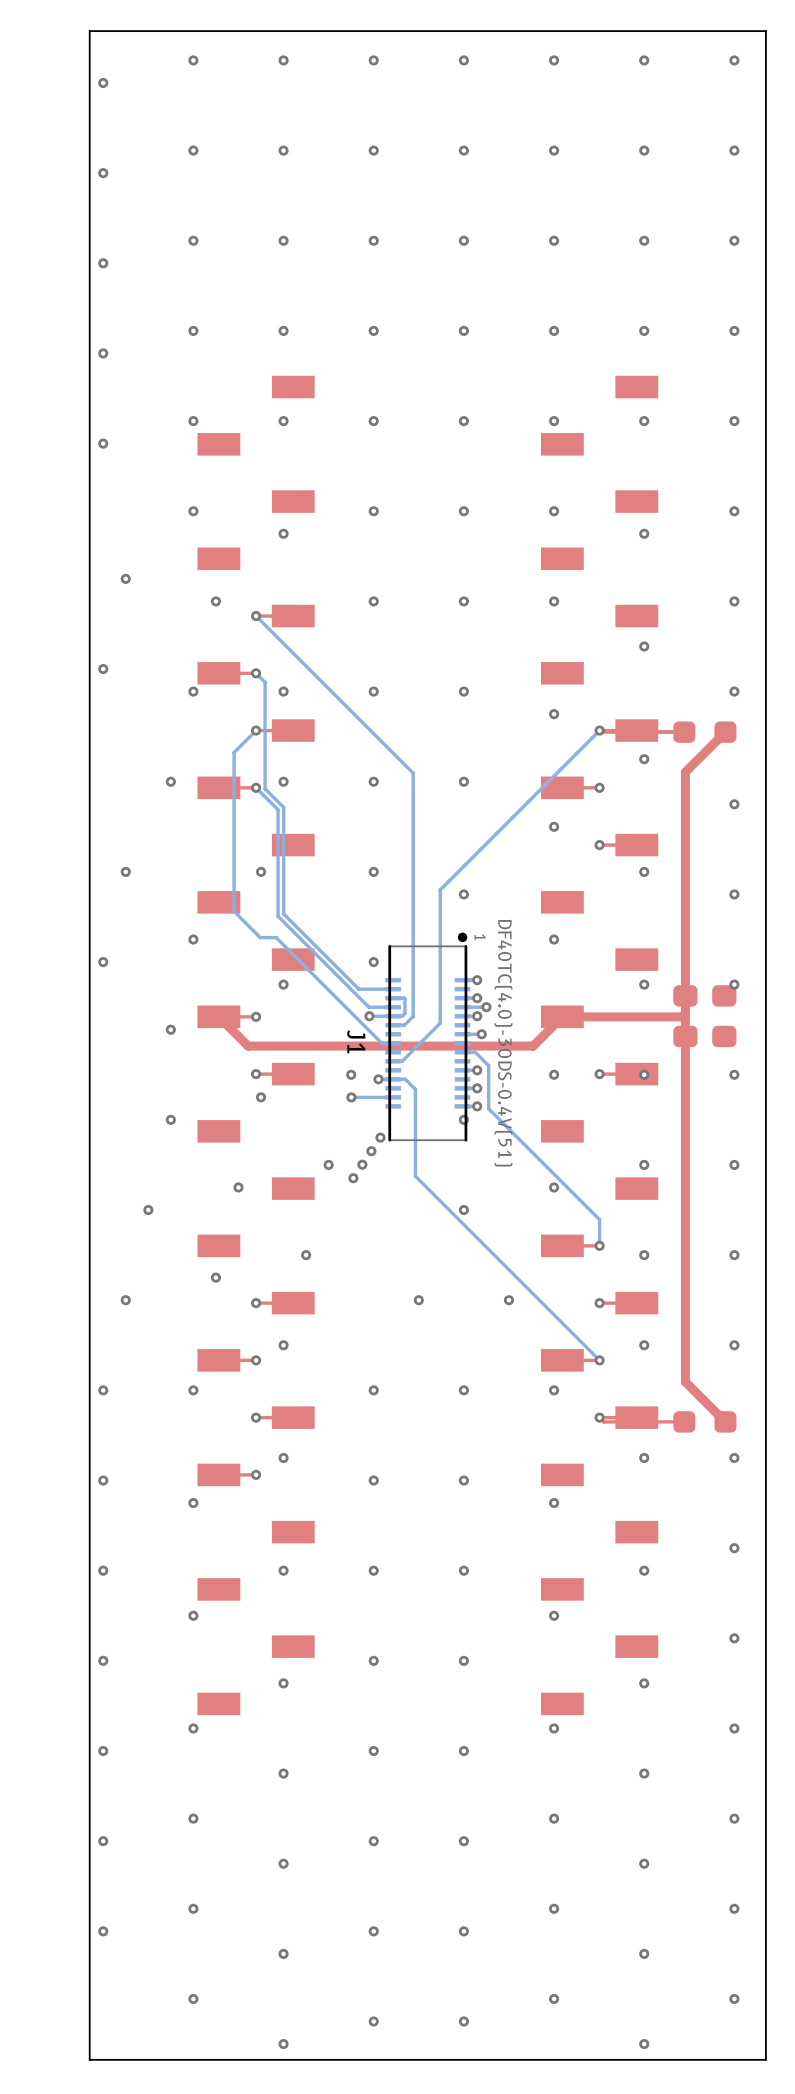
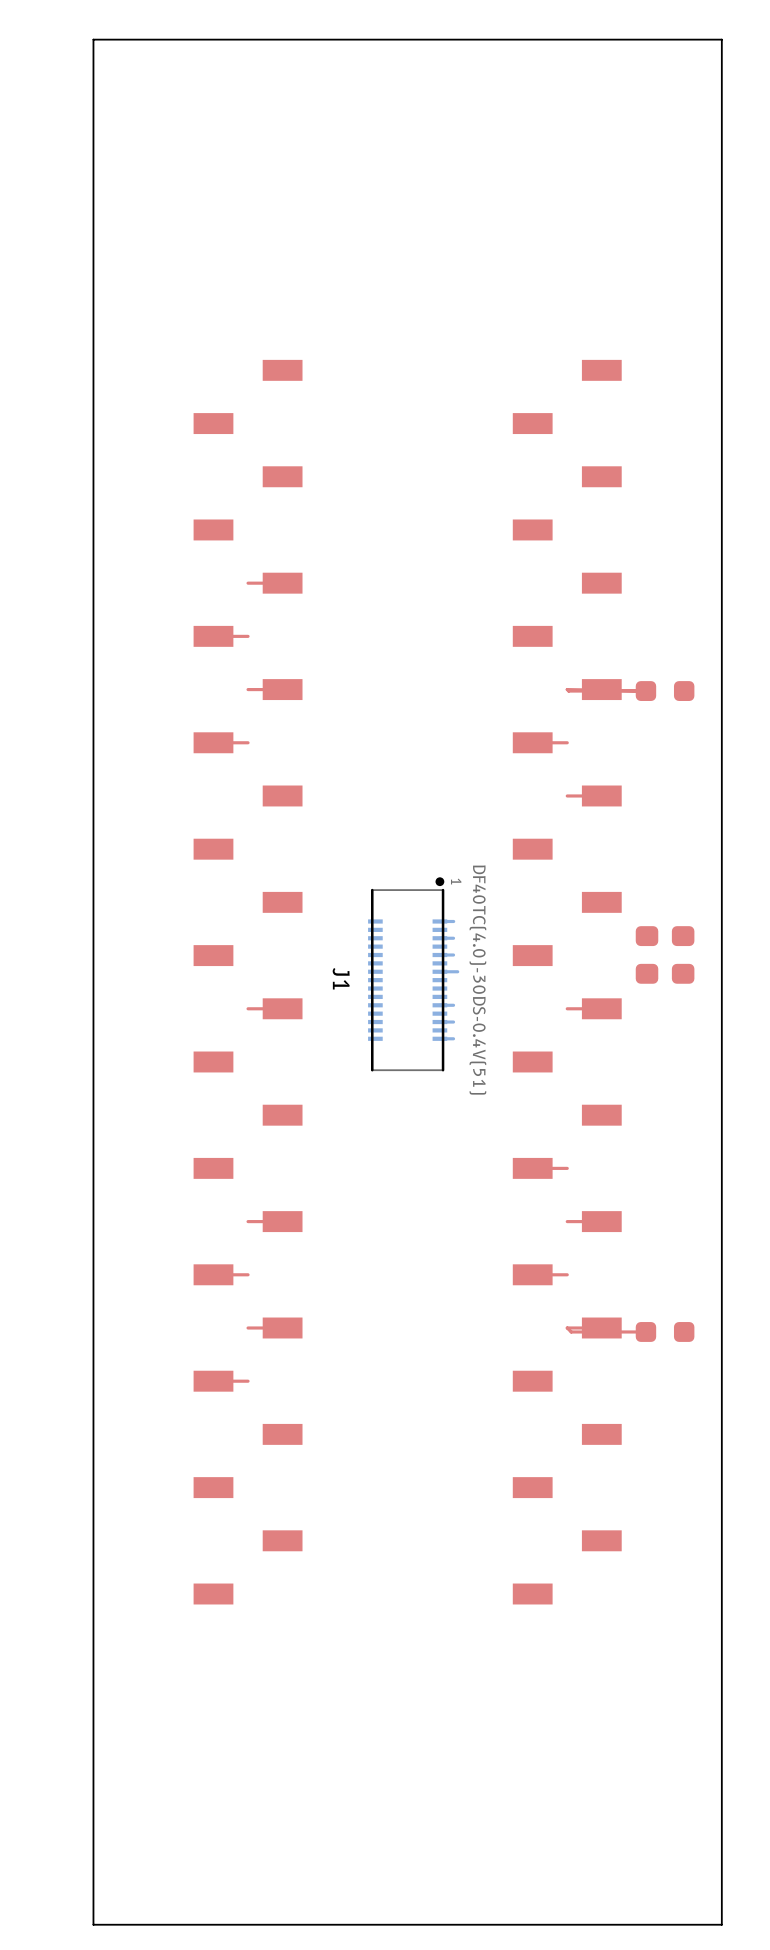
via: (193, 60) -> none
via: (283, 60) -> none
via: (373, 60) -> none
via: (463, 60) -> none
via: (554, 60) -> none
via: (644, 60) -> none
via: (734, 60) -> none
via: (103, 82) -> none
via: (193, 150) -> none
via: (283, 150) -> none
via: (373, 150) -> none
via: (463, 150) -> none
via: (554, 150) -> none
via: (644, 150) -> none
via: (734, 150) -> none
via: (103, 173) -> none
via: (193, 240) -> none
via: (283, 240) -> none
via: (373, 240) -> none
via: (463, 240) -> none
via: (554, 240) -> none
via: (644, 240) -> none
via: (734, 240) -> none
via: (103, 263) -> none
via: (193, 330) -> none
via: (283, 330) -> none
via: (373, 330) -> none
via: (463, 330) -> none
via: (554, 330) -> none
via: (644, 330) -> none
via: (734, 330) -> none
via: (103, 353) -> none
via: (193, 421) -> none
via: (283, 421) -> none
via: (373, 421) -> none
via: (463, 421) -> none
via: (554, 421) -> none
via: (644, 421) -> none
via: (734, 421) -> none
via: (103, 443) -> none
via: (193, 511) -> none
via: (373, 511) -> none
via: (463, 511) -> none
via: (554, 511) -> none
via: (734, 511) -> none
via: (283, 533) -> none
via: (644, 533) -> none
via: (125, 578) -> none
via: (215, 601) -> none
via: (373, 601) -> none
via: (463, 601) -> none
via: (554, 601) -> none
via: (734, 601) -> none
bottom track: (256, 616) (413, 773) (413, 1016) (404, 1025) (393, 1025) -> none
via: (256, 616) -> none
via: (644, 646) -> none
via: (103, 669) -> none
bottom track: (256, 673) (265, 682) (265, 788) (283, 807) (283, 913) (358, 989) (393, 989) -> none
via: (256, 673) -> none
via: (193, 691) -> none
via: (283, 691) -> none
via: (373, 691) -> none
via: (463, 691) -> none
via: (734, 691) -> none
via: (554, 714) -> none
bottom track: (256, 730) (234, 752) (234, 911) (260, 937) (276, 937) (381, 1043) (393, 1043) -> none
via: (256, 730) -> none
bottom track: (599, 730) (440, 889) (440, 1023) (402, 1061) (393, 1061) -> none
via: (599, 730) -> none
top track: (725, 732) (685, 772) (685, 1381) (725, 1421) -> none
via: (644, 759) -> none
via: (170, 781) -> none
via: (283, 781) -> none
via: (373, 781) -> none
via: (463, 781) -> none
bottom track: (256, 787) (278, 809) (278, 916) (368, 1007) (393, 1007) -> none
via: (256, 787) -> none
via: (599, 787) -> none
via: (734, 804) -> none
via: (554, 826) -> none
via: (599, 845) -> none
via: (125, 871) -> none
via: (261, 871) -> none
via: (373, 871) -> none
via: (644, 871) -> none
via: (463, 894) -> none
via: (734, 894) -> none
via: (193, 939) -> none
via: (554, 939) -> none
via: (103, 962) -> none
via: (373, 962) -> none
via: (477, 980) -> none
via: (283, 984) -> none
via: (644, 984) -> none
via: (734, 984) -> none
bottom track: (393, 998) (404, 998) (404, 1013) (402, 1016) (369, 1016) -> none
via: (477, 998) -> none
bottom track: (486, 1007) (462, 1007) -> none
via: (486, 1007) -> none
top track: (685, 1013) (682, 1016) (562, 1016) (533, 1046) (248, 1046) (218, 1016) (256, 1016) -> none
via: (256, 1016) -> none
via: (369, 1016) -> none
via: (477, 1016) -> none
via: (170, 1029) -> none
via: (481, 1034) -> none
bottom track: (462, 1052) (475, 1052) (488, 1065) (488, 1108) (599, 1219) (599, 1245) -> none
via: (477, 1070) -> none
via: (256, 1074) -> none
via: (351, 1074) -> none
via: (554, 1074) -> none
via: (599, 1074) -> none
via: (644, 1074) -> none
via: (734, 1074) -> none
bottom track: (378, 1079) (405, 1079) (415, 1089) (415, 1176) (599, 1360) -> none
via: (378, 1079) -> none
via: (477, 1088) -> none
via: (261, 1097) -> none
via: (351, 1097) -> none
bottom track: (393, 1097) (351, 1097) -> none
via: (477, 1106) -> none
via: (170, 1119) -> none
via: (463, 1119) -> none
via: (380, 1137) -> none
via: (371, 1151) -> none
via: (328, 1164) -> none
via: (362, 1164) -> none
via: (644, 1164) -> none
via: (734, 1164) -> none
via: (353, 1178) -> none
via: (238, 1187) -> none
via: (554, 1187) -> none
via: (148, 1210) -> none
via: (463, 1210) -> none
via: (599, 1245) -> none
via: (306, 1255) -> none
via: (644, 1255) -> none
via: (734, 1255) -> none
via: (215, 1277) -> none
via: (125, 1300) -> none
via: (418, 1300) -> none
via: (508, 1300) -> none
via: (256, 1303) -> none
via: (599, 1303) -> none
via: (283, 1345) -> none
via: (644, 1345) -> none
via: (734, 1345) -> none
via: (256, 1360) -> none
via: (599, 1360) -> none
via: (103, 1390) -> none
via: (193, 1390) -> none
via: (373, 1390) -> none
via: (463, 1390) -> none
via: (554, 1390) -> none
via: (256, 1417) -> none
via: (599, 1417) -> none
via: (283, 1457) -> none
via: (644, 1457) -> none
via: (734, 1457) -> none
via: (256, 1474) -> none
via: (103, 1480) -> none
via: (373, 1480) -> none
via: (463, 1480) -> none
via: (193, 1503) -> none
via: (554, 1503) -> none
via: (734, 1548) -> none
via: (103, 1570) -> none
via: (283, 1570) -> none
via: (373, 1570) -> none
via: (463, 1570) -> none
via: (644, 1570) -> none
via: (193, 1615) -> none
via: (554, 1615) -> none
via: (734, 1638) -> none
via: (103, 1660) -> none
via: (373, 1660) -> none
via: (463, 1660) -> none
via: (283, 1683) -> none
via: (644, 1683) -> none
via: (193, 1728) -> none
via: (554, 1728) -> none
via: (734, 1728) -> none
via: (103, 1751) -> none
via: (373, 1751) -> none
via: (463, 1751) -> none
via: (283, 1773) -> none
via: (644, 1773) -> none
via: (193, 1818) -> none
via: (554, 1818) -> none
via: (734, 1818) -> none
via: (103, 1841) -> none
via: (373, 1841) -> none
via: (463, 1841) -> none
via: (283, 1863) -> none
via: (644, 1863) -> none
via: (193, 1908) -> none
via: (554, 1908) -> none
via: (734, 1908) -> none
via: (103, 1931) -> none
via: (373, 1931) -> none
via: (463, 1931) -> none
via: (283, 1953) -> none
via: (644, 1953) -> none
via: (193, 1998) -> none
via: (554, 1998) -> none
via: (734, 1998) -> none
via: (373, 2021) -> none
via: (463, 2021) -> none
via: (283, 2044) -> none
via: (644, 2044) -> none

